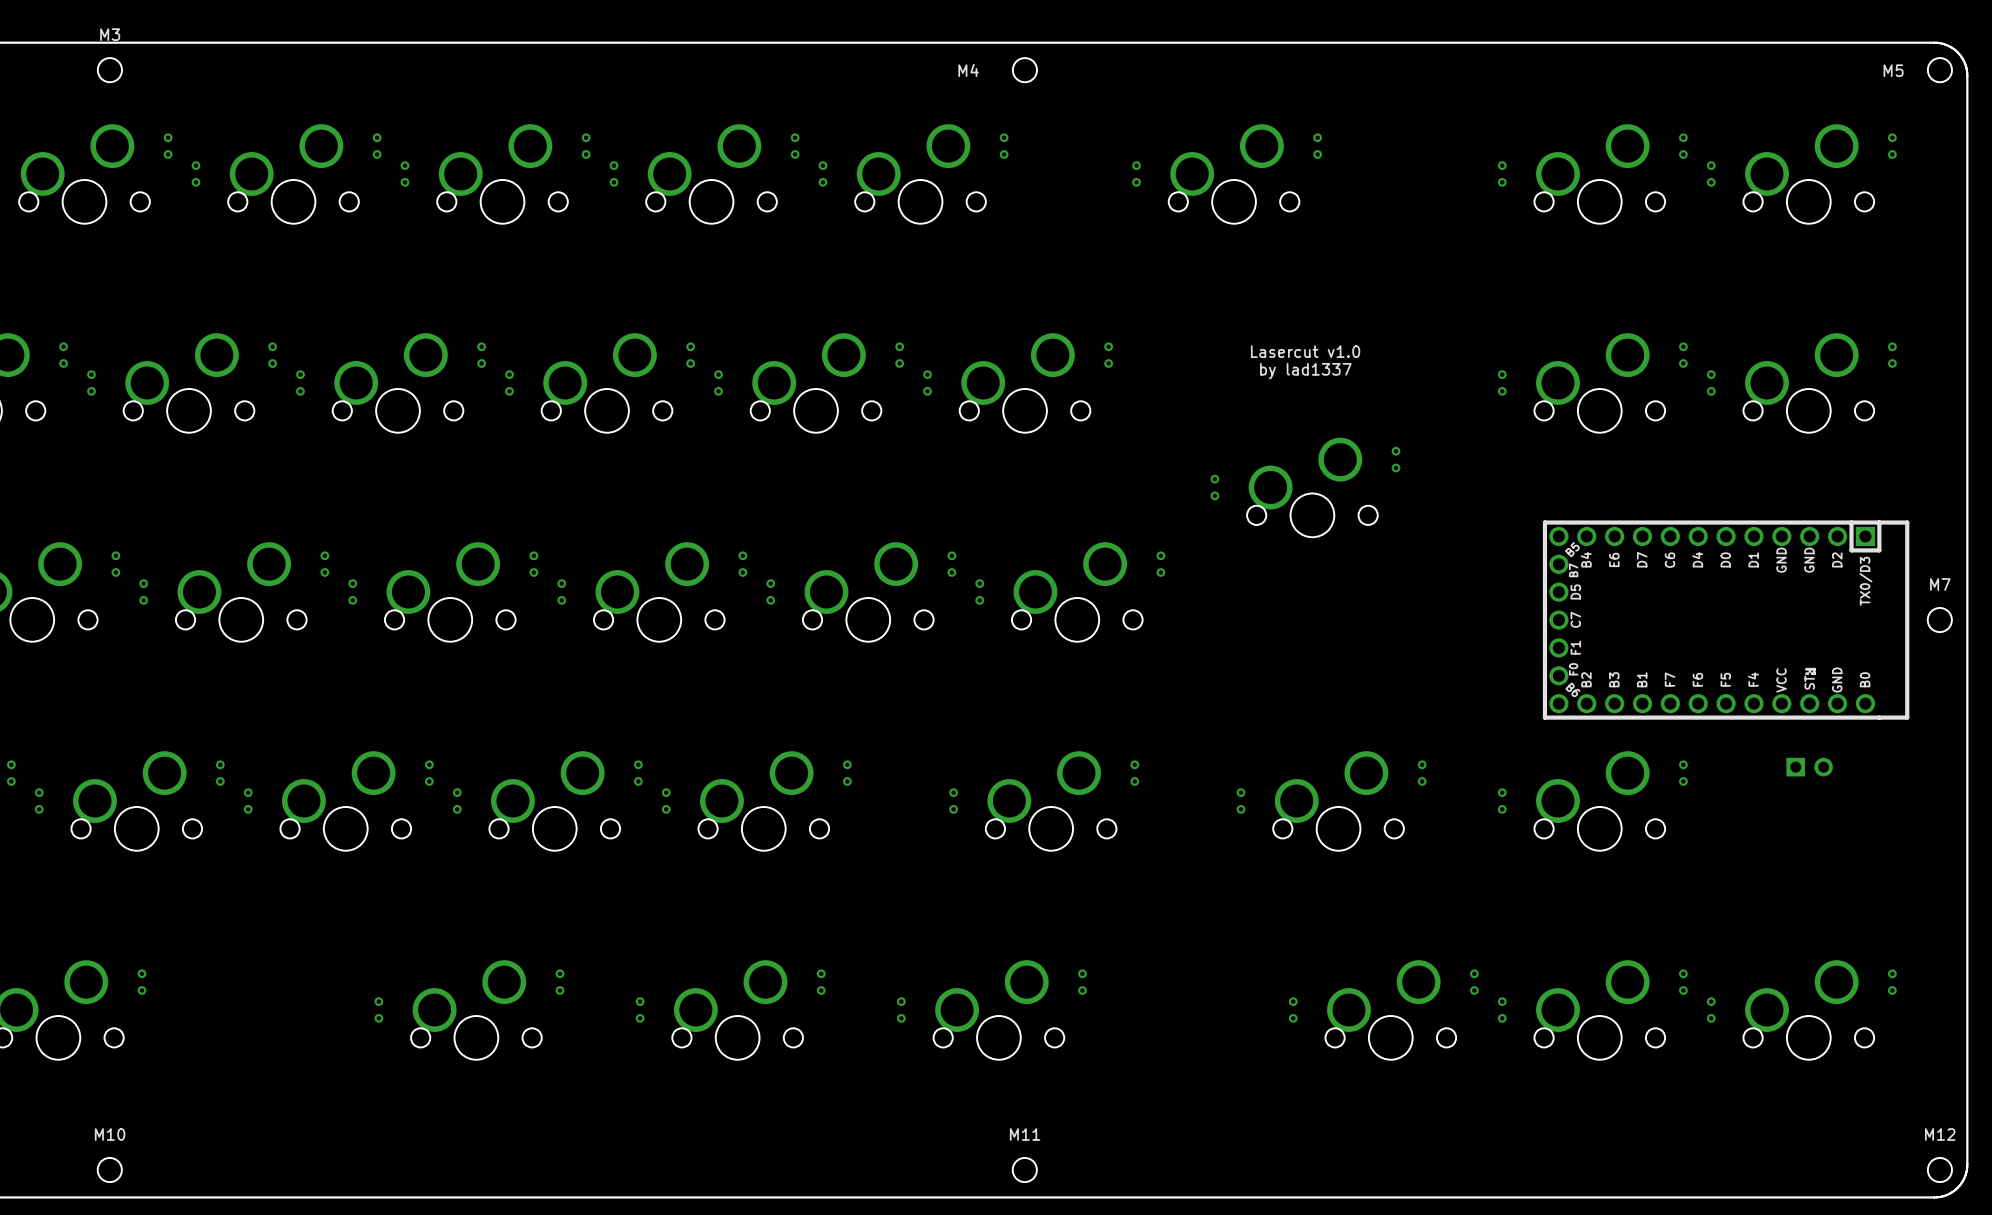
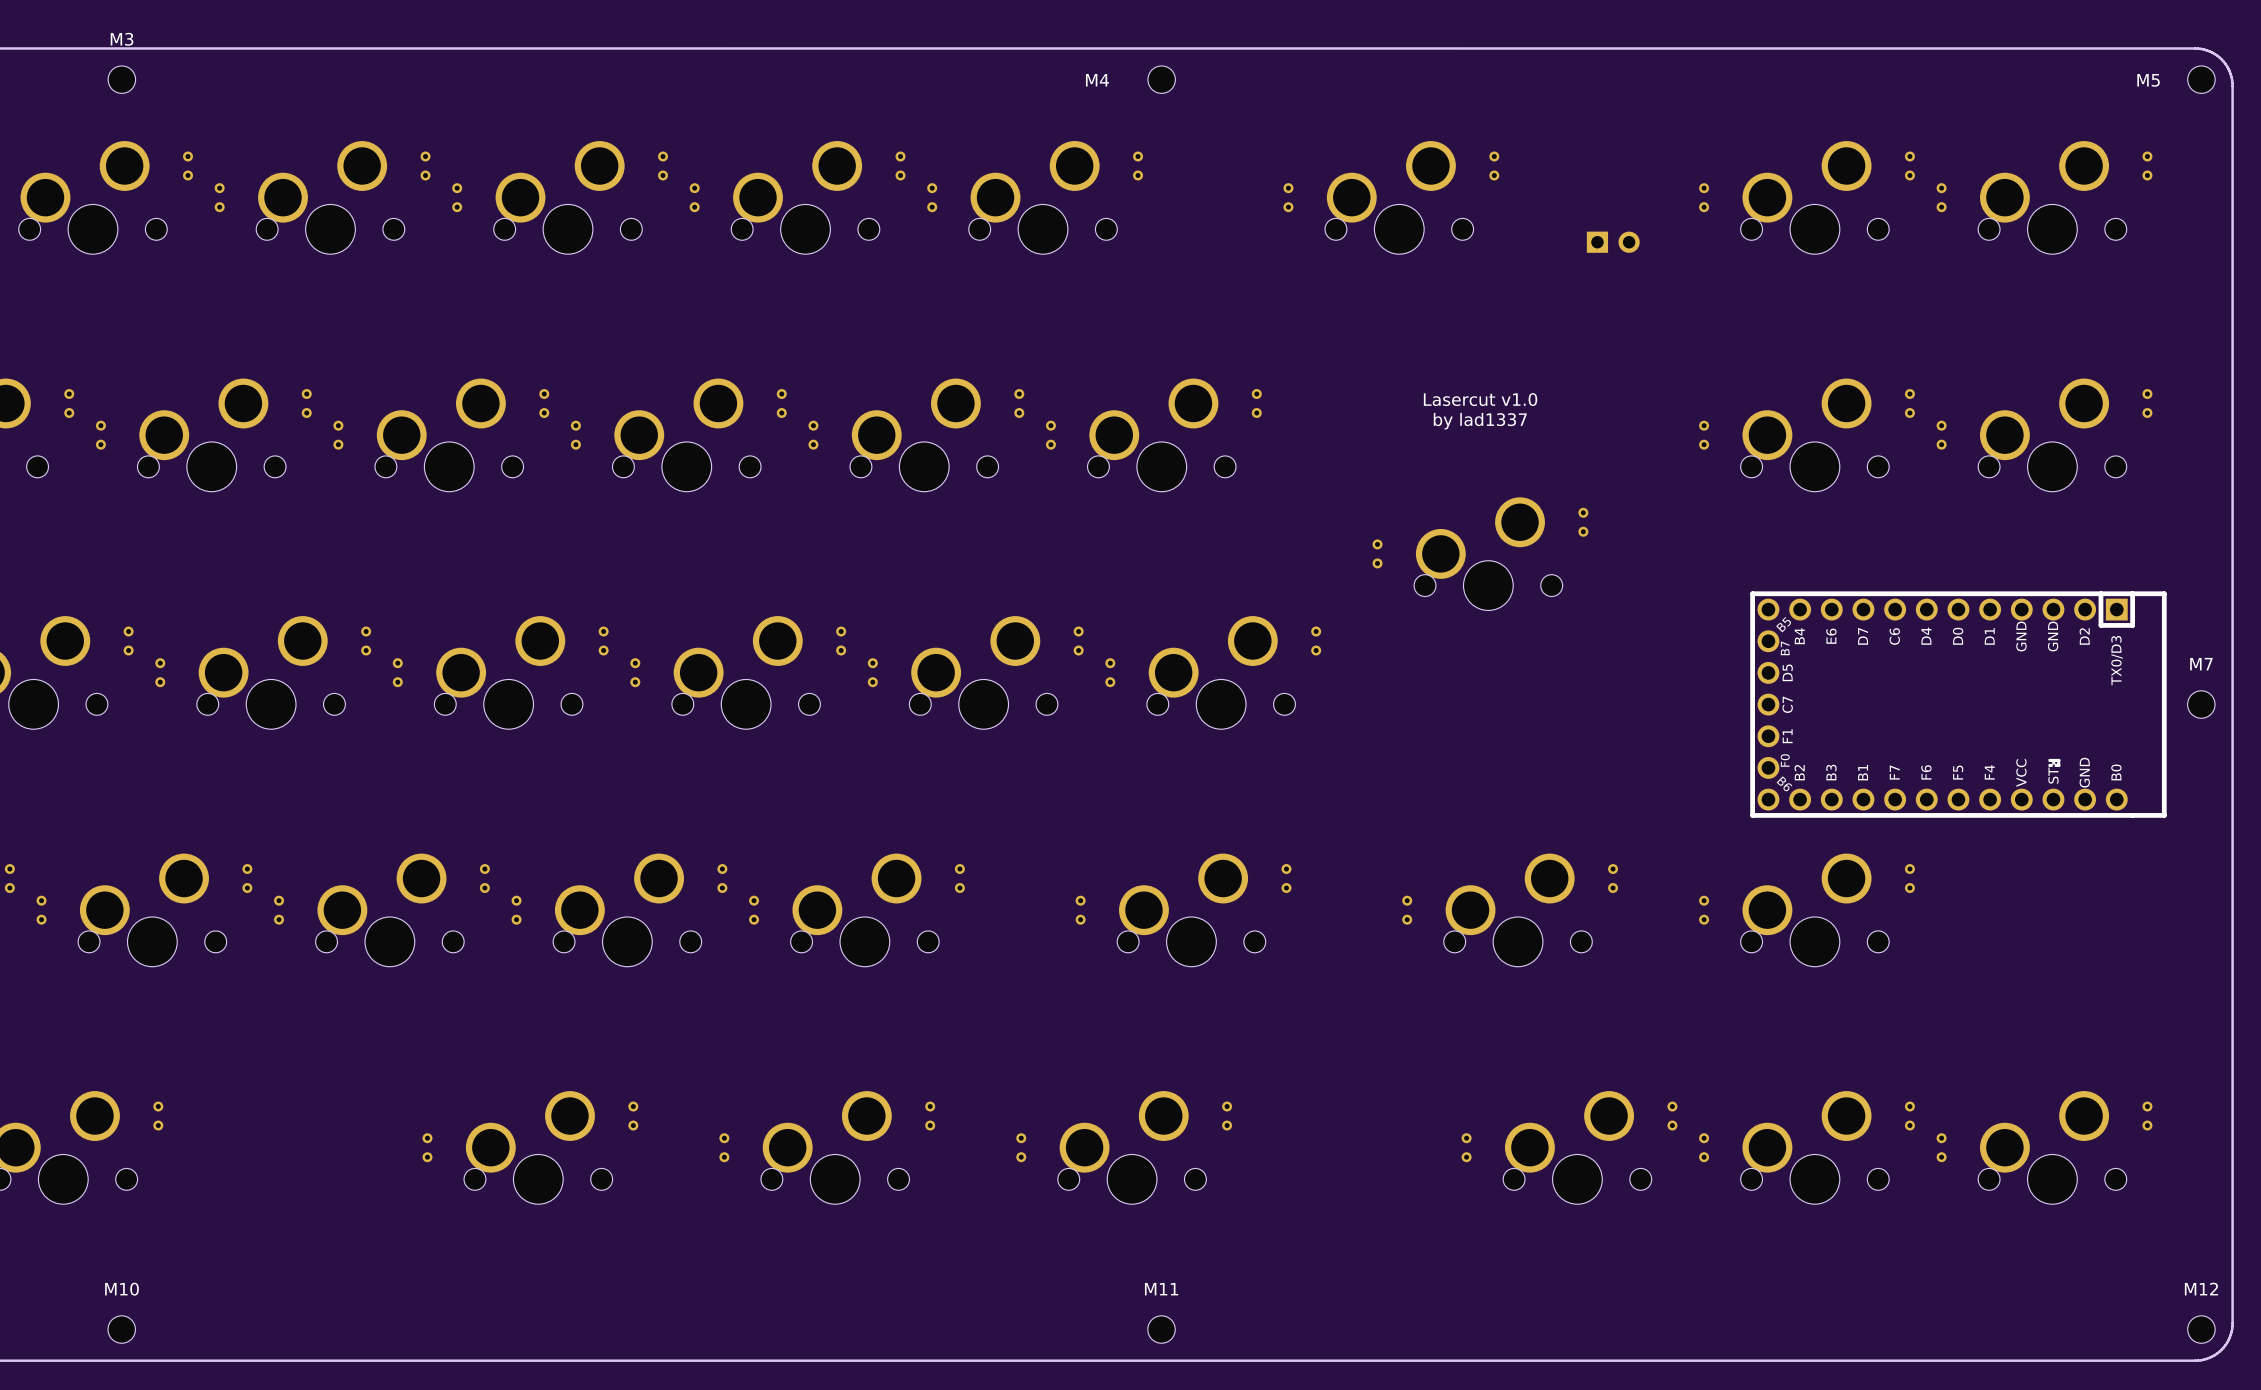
part: none -> (1613, 242)
part: (1809, 767) -> none

